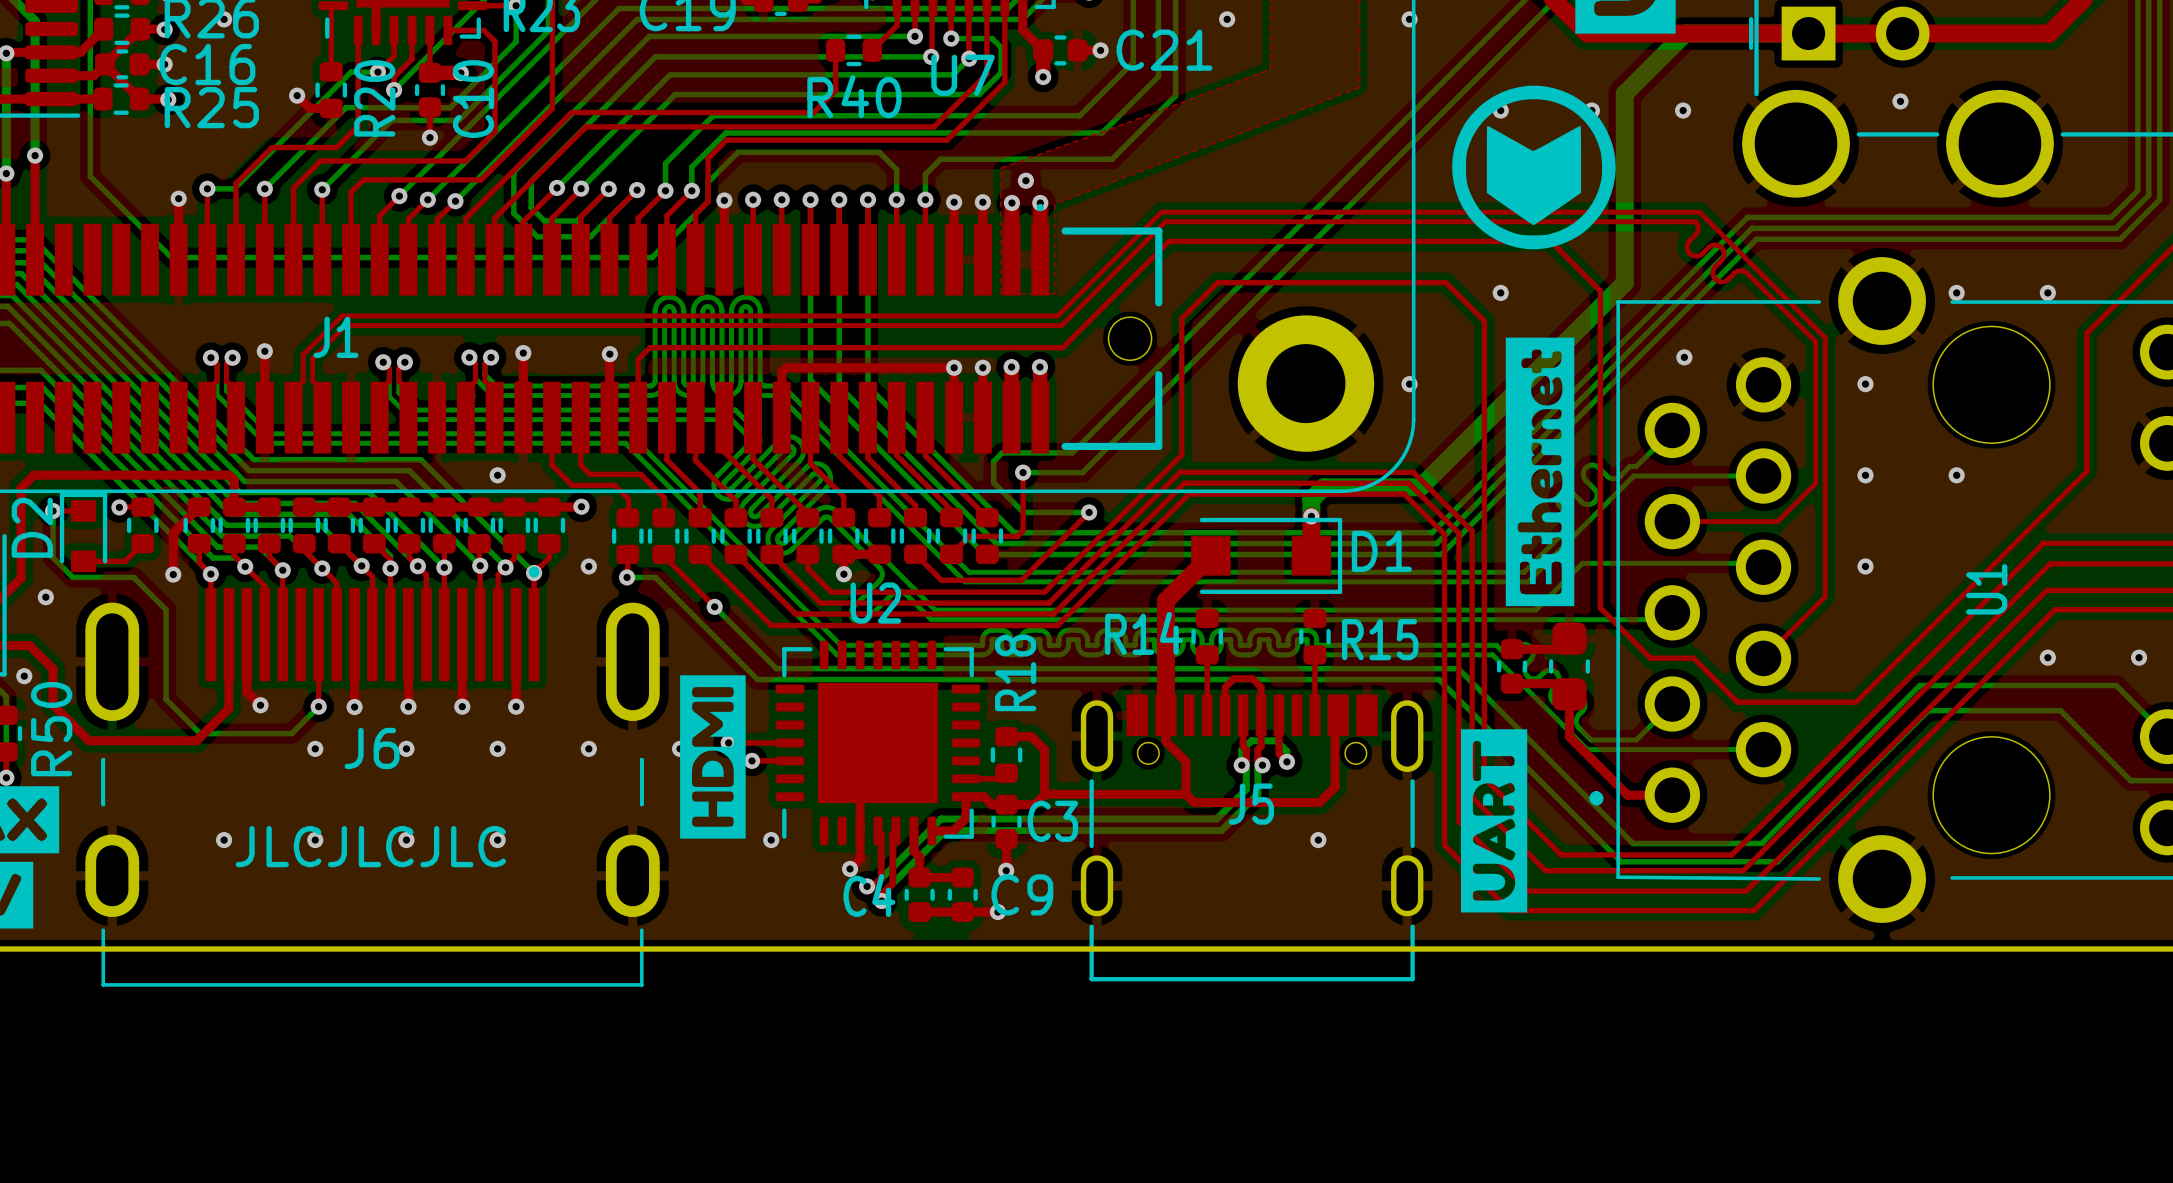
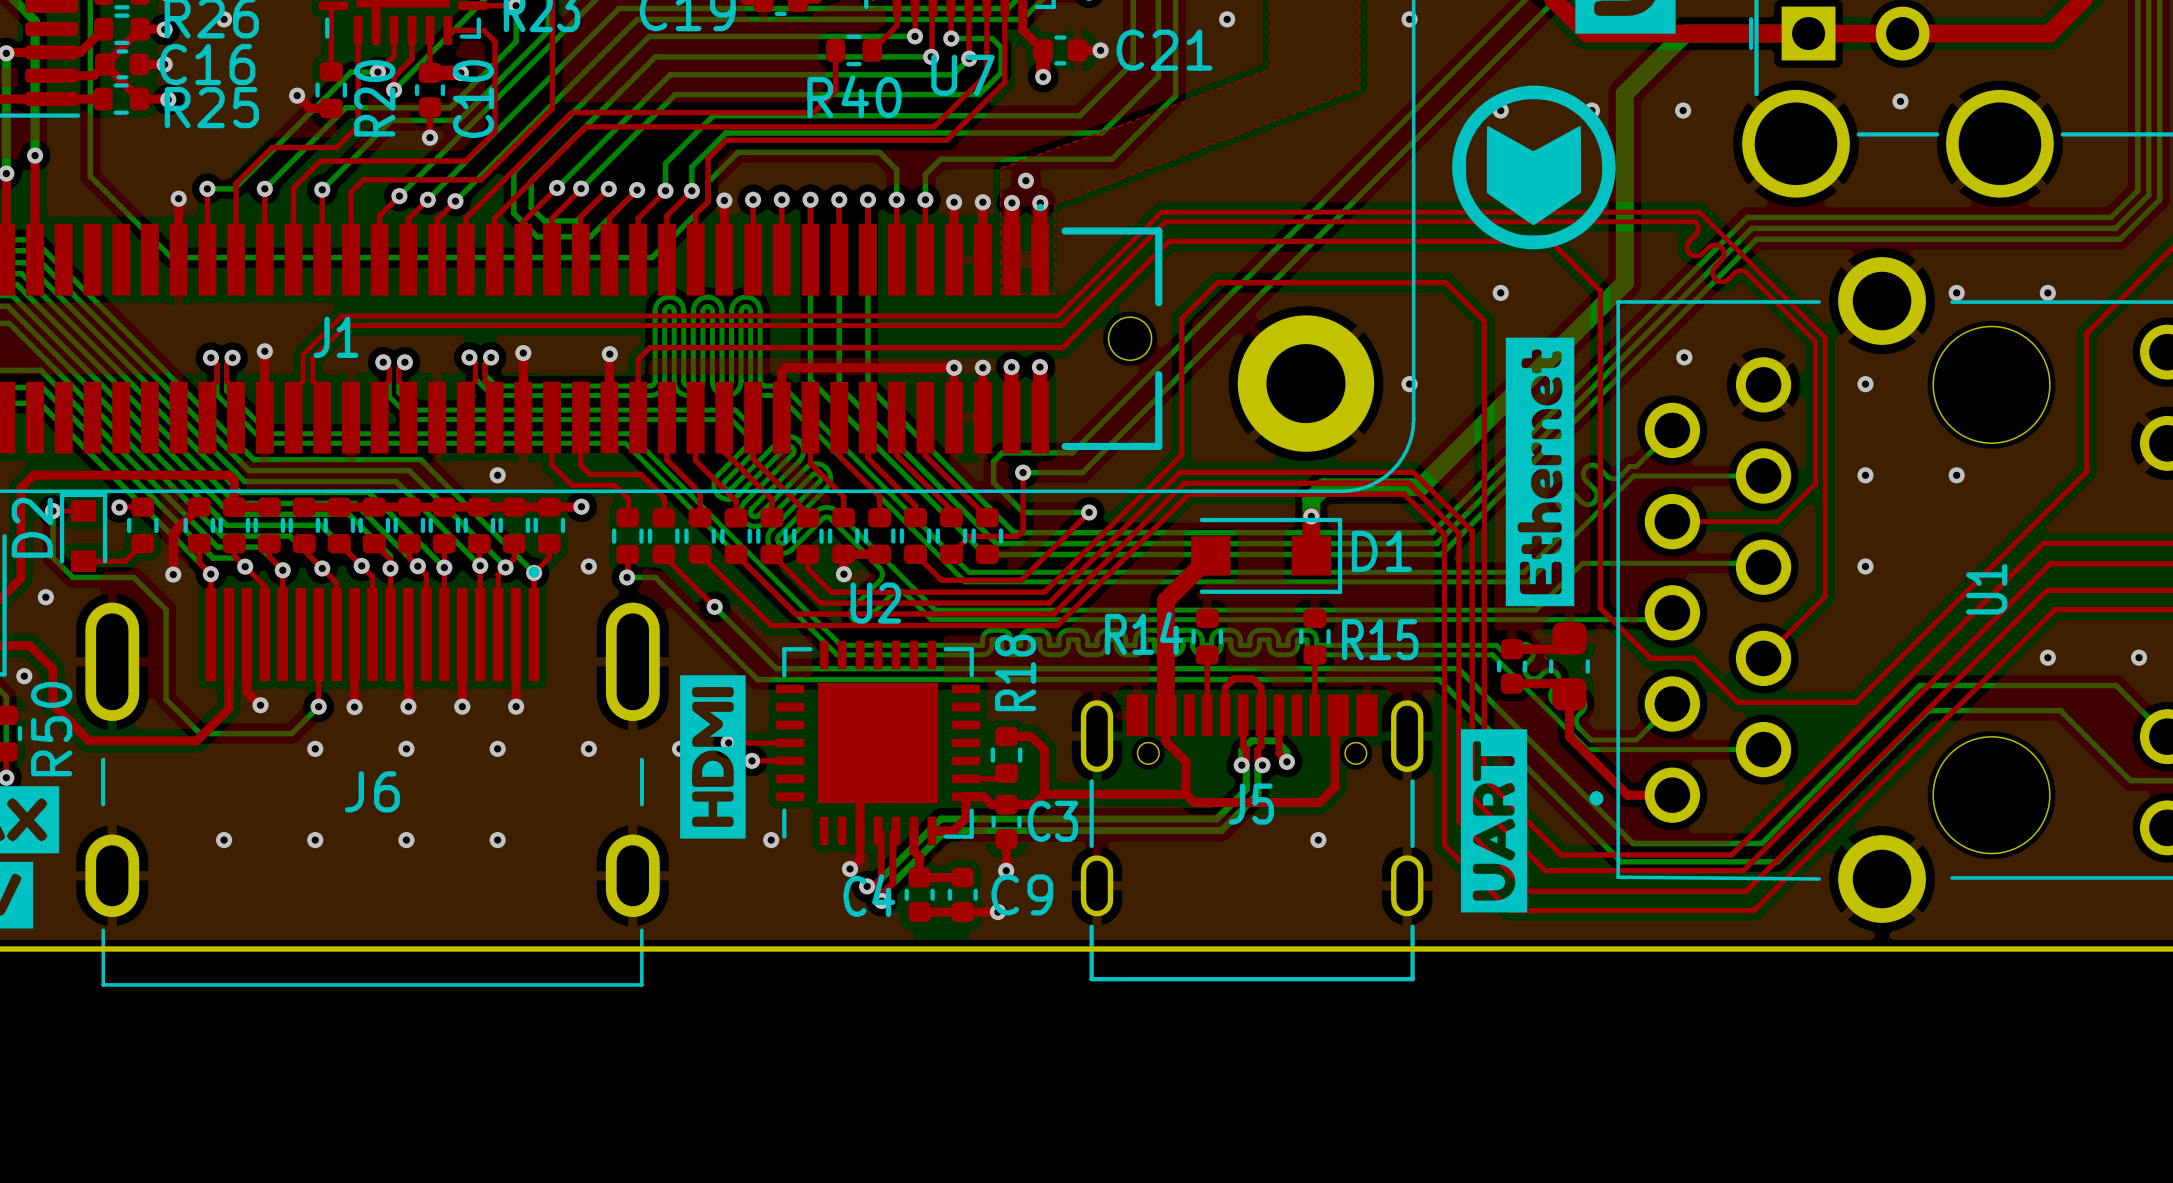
J6 name position: J6 (372, 748) -> J6 (372, 791)
text: JLCJLCJLC (370, 846) -> none

